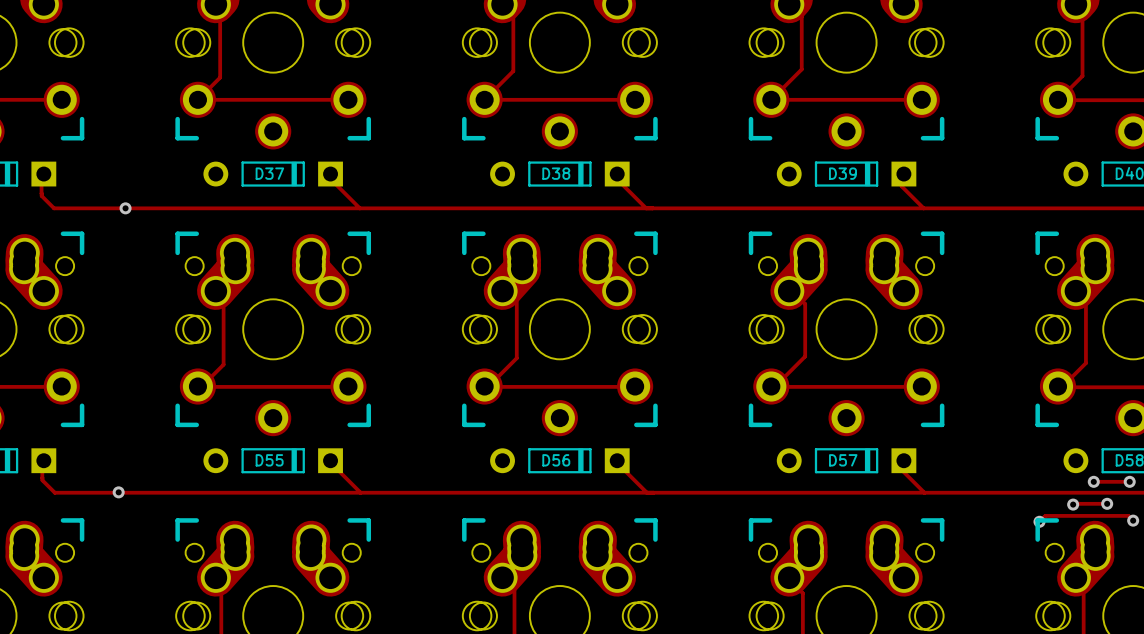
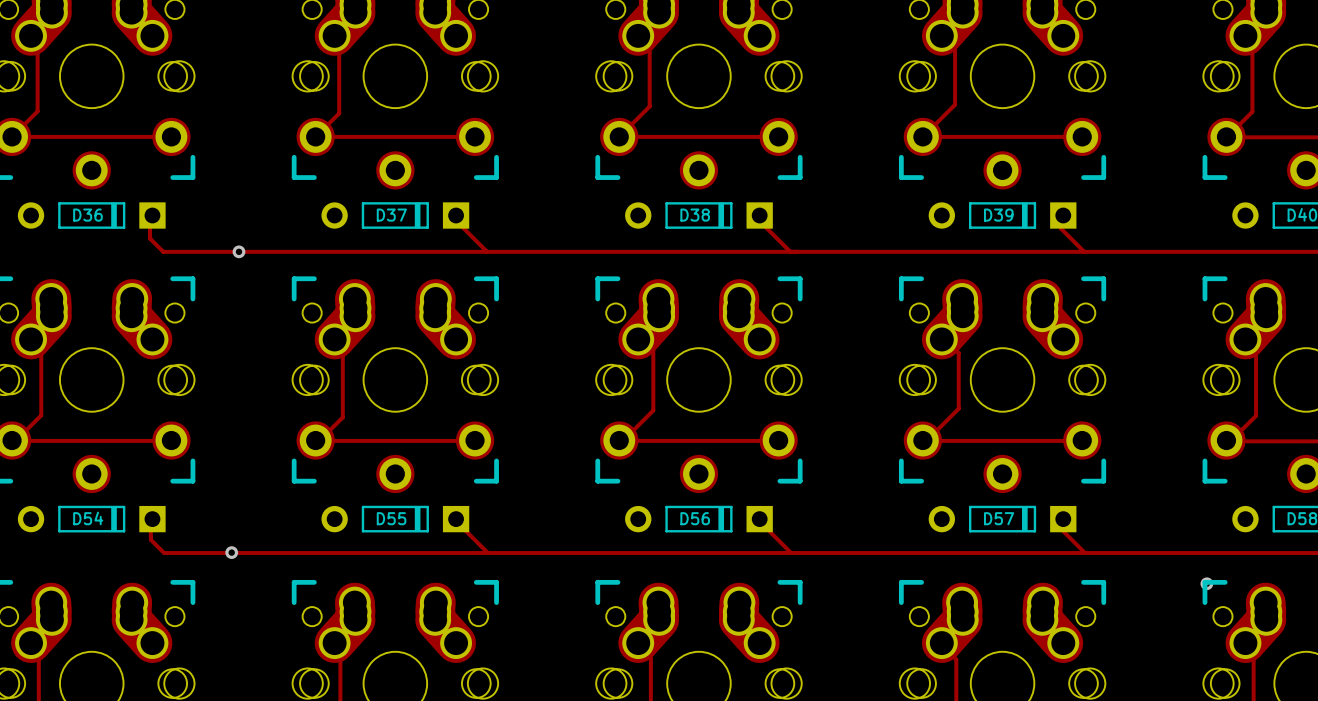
track: (1093, 481) (1129, 481) -> none
via: (1093, 481) -> none
via: (1129, 481) -> none
track: (1107, 503) (1073, 504) -> none
via: (1107, 503) -> none
via: (1073, 504) -> none
track: (1133, 520) (1128, 515) (1045, 515) (1039, 521) -> none
via: (1133, 520) -> none

